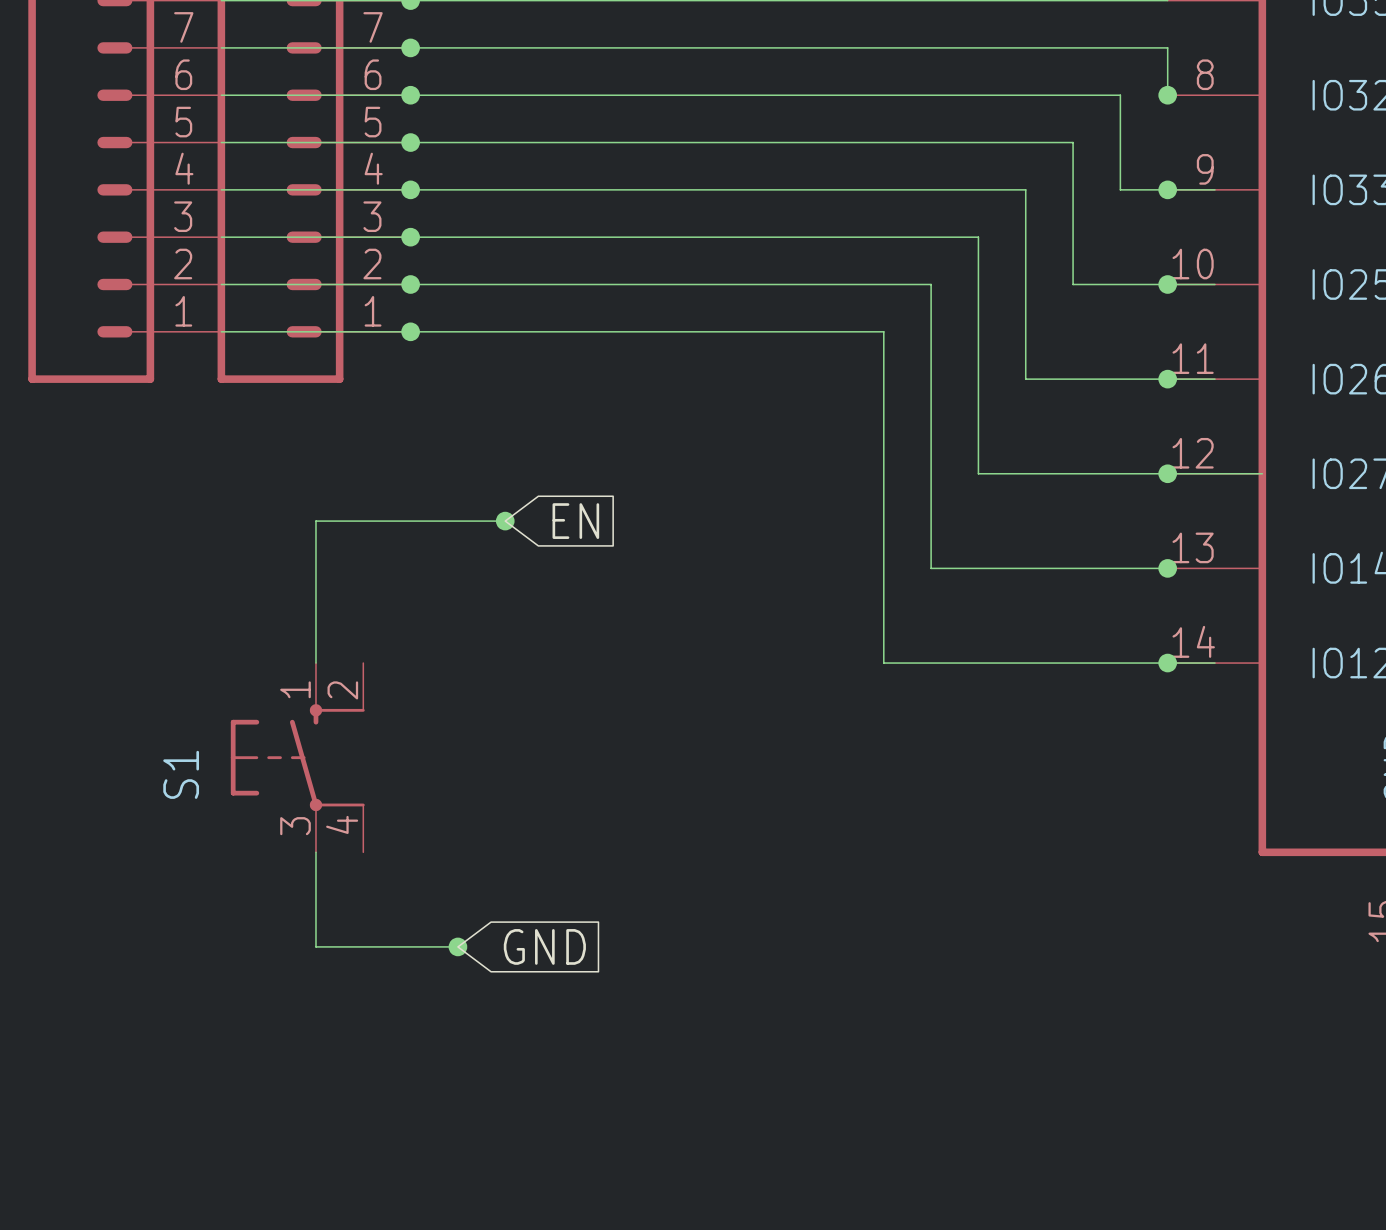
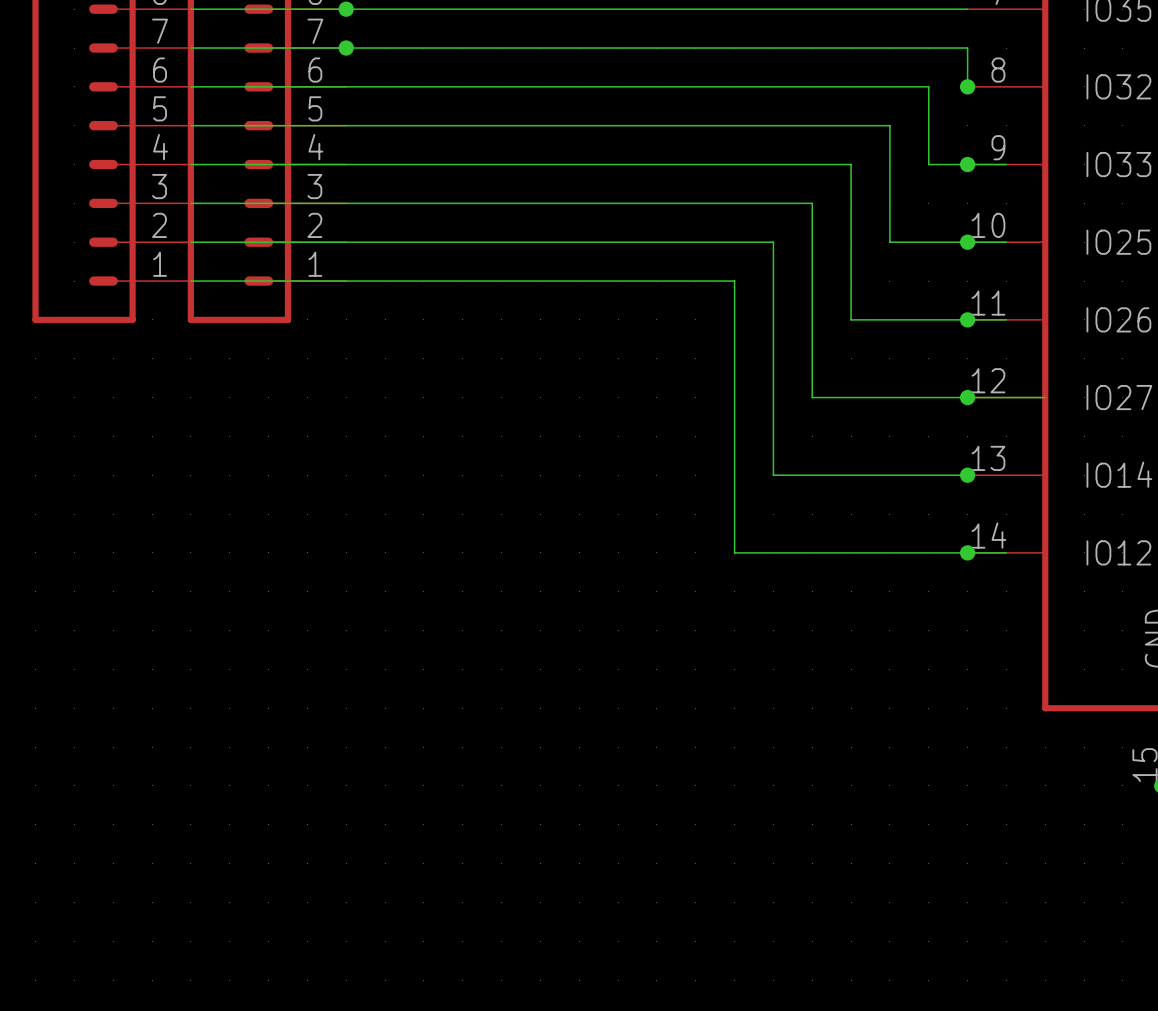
junction: (410, 95) -> none
junction: (410, 142) -> none
junction: (410, 189) -> none
junction: (410, 237) -> none
junction: (410, 284) -> none
junction: (410, 331) -> none
wire: (505, 521) (315, 521) (315, 663) -> none
junction: (505, 521) -> none
global label: EN (575, 521) -> none
S1: (297, 757) -> none
wire: (315, 852) (315, 946) (457, 946) -> none
junction: (457, 946) -> none
global label: GND (544, 946) -> none

